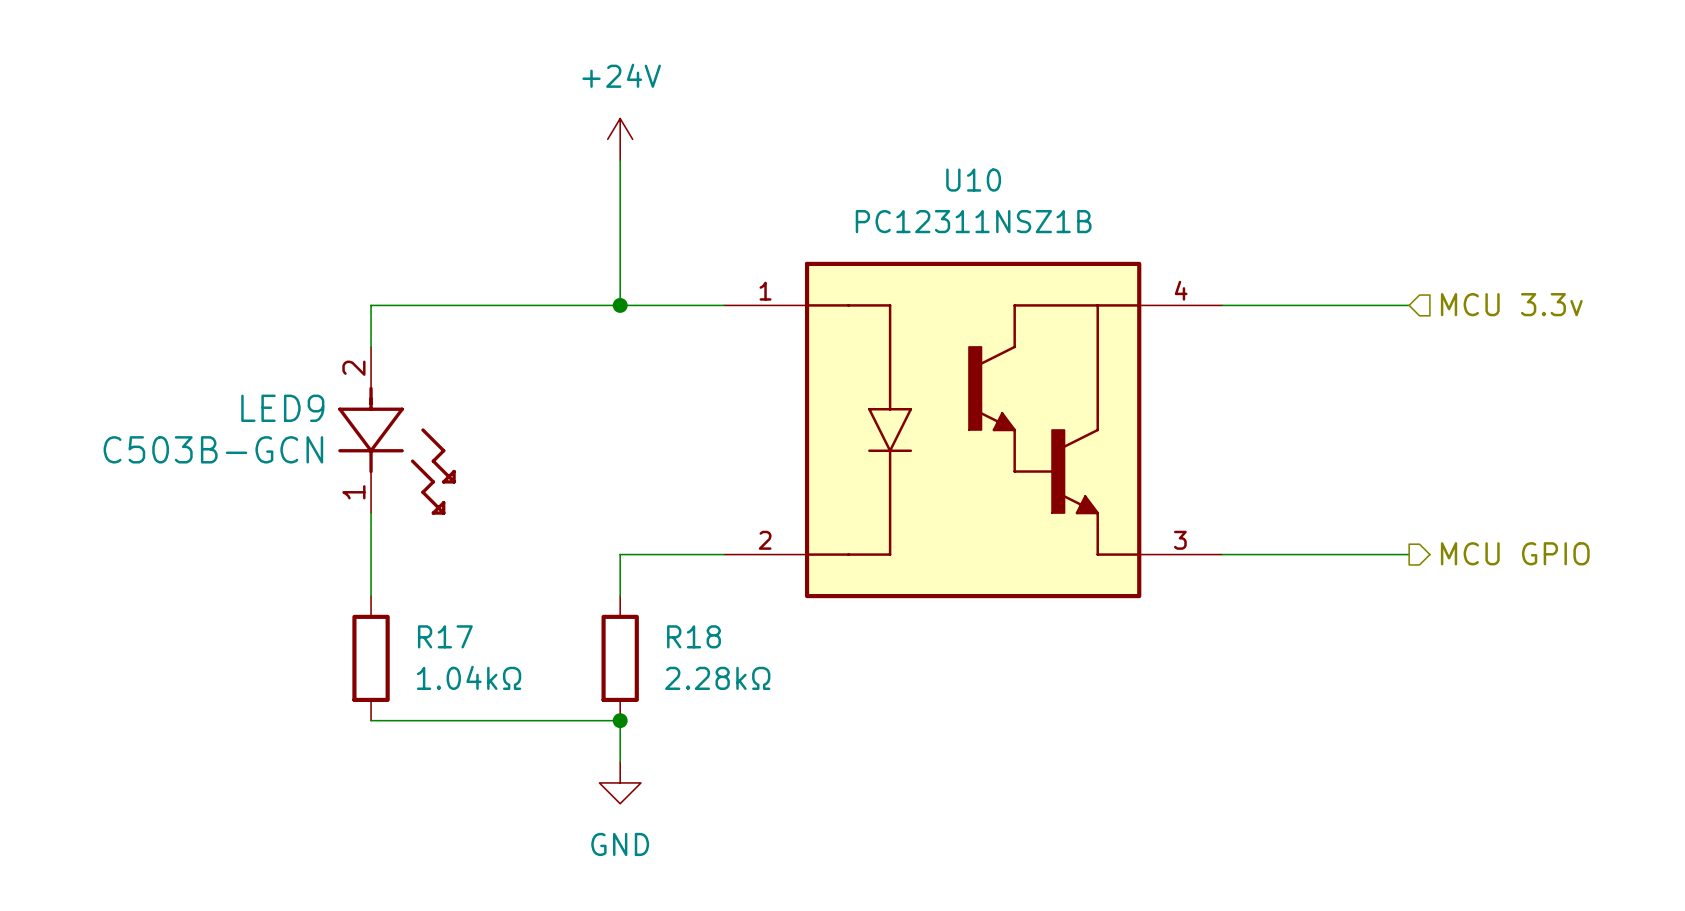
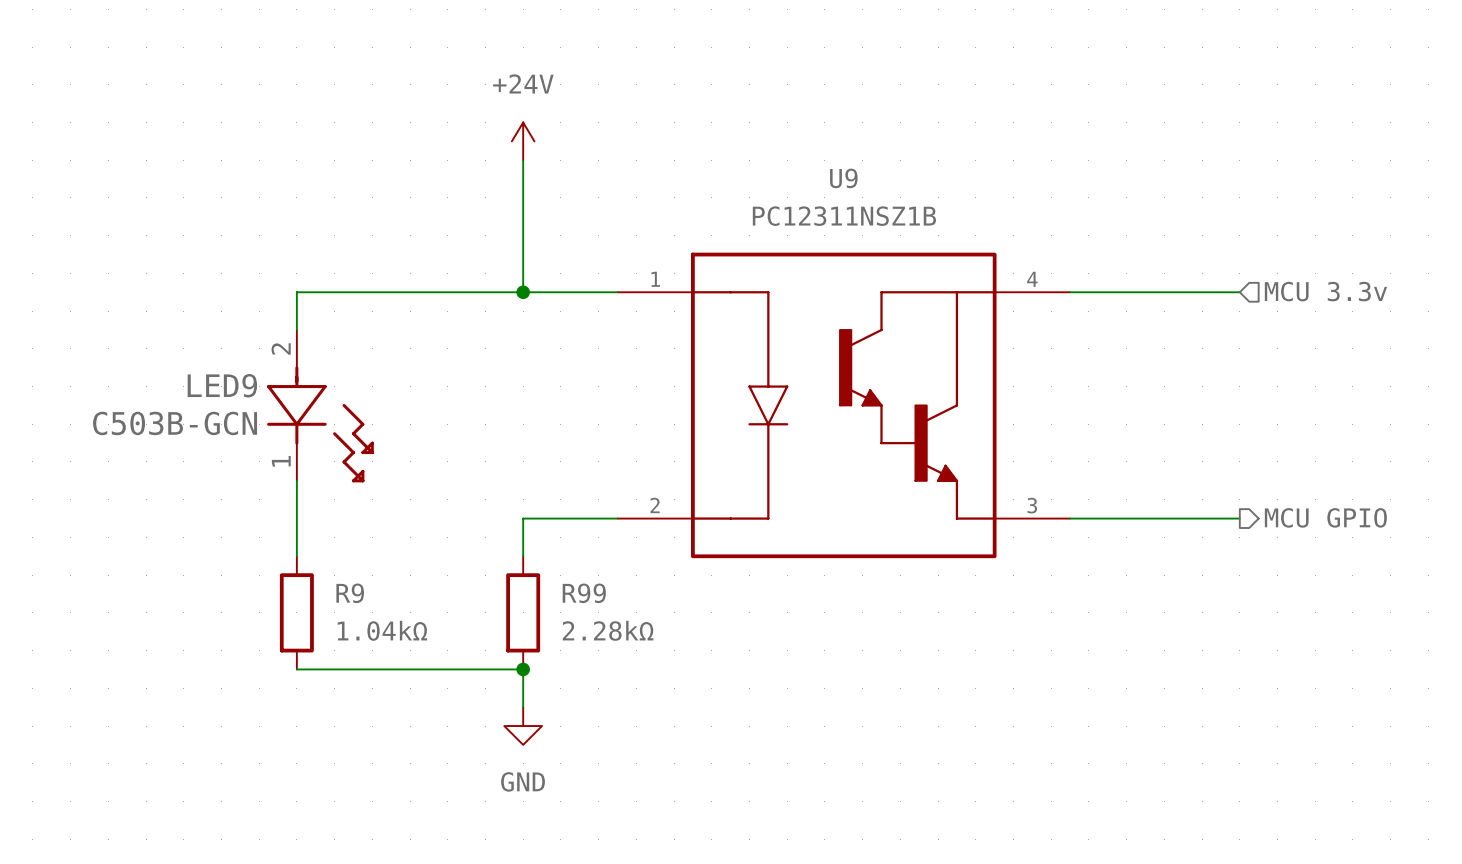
U10 name: U10 (973, 180) -> U9 (843, 178)
R17 name: R17 (445, 636) -> R9 (350, 593)
R18 name: R18 (694, 636) -> R99 (584, 593)

